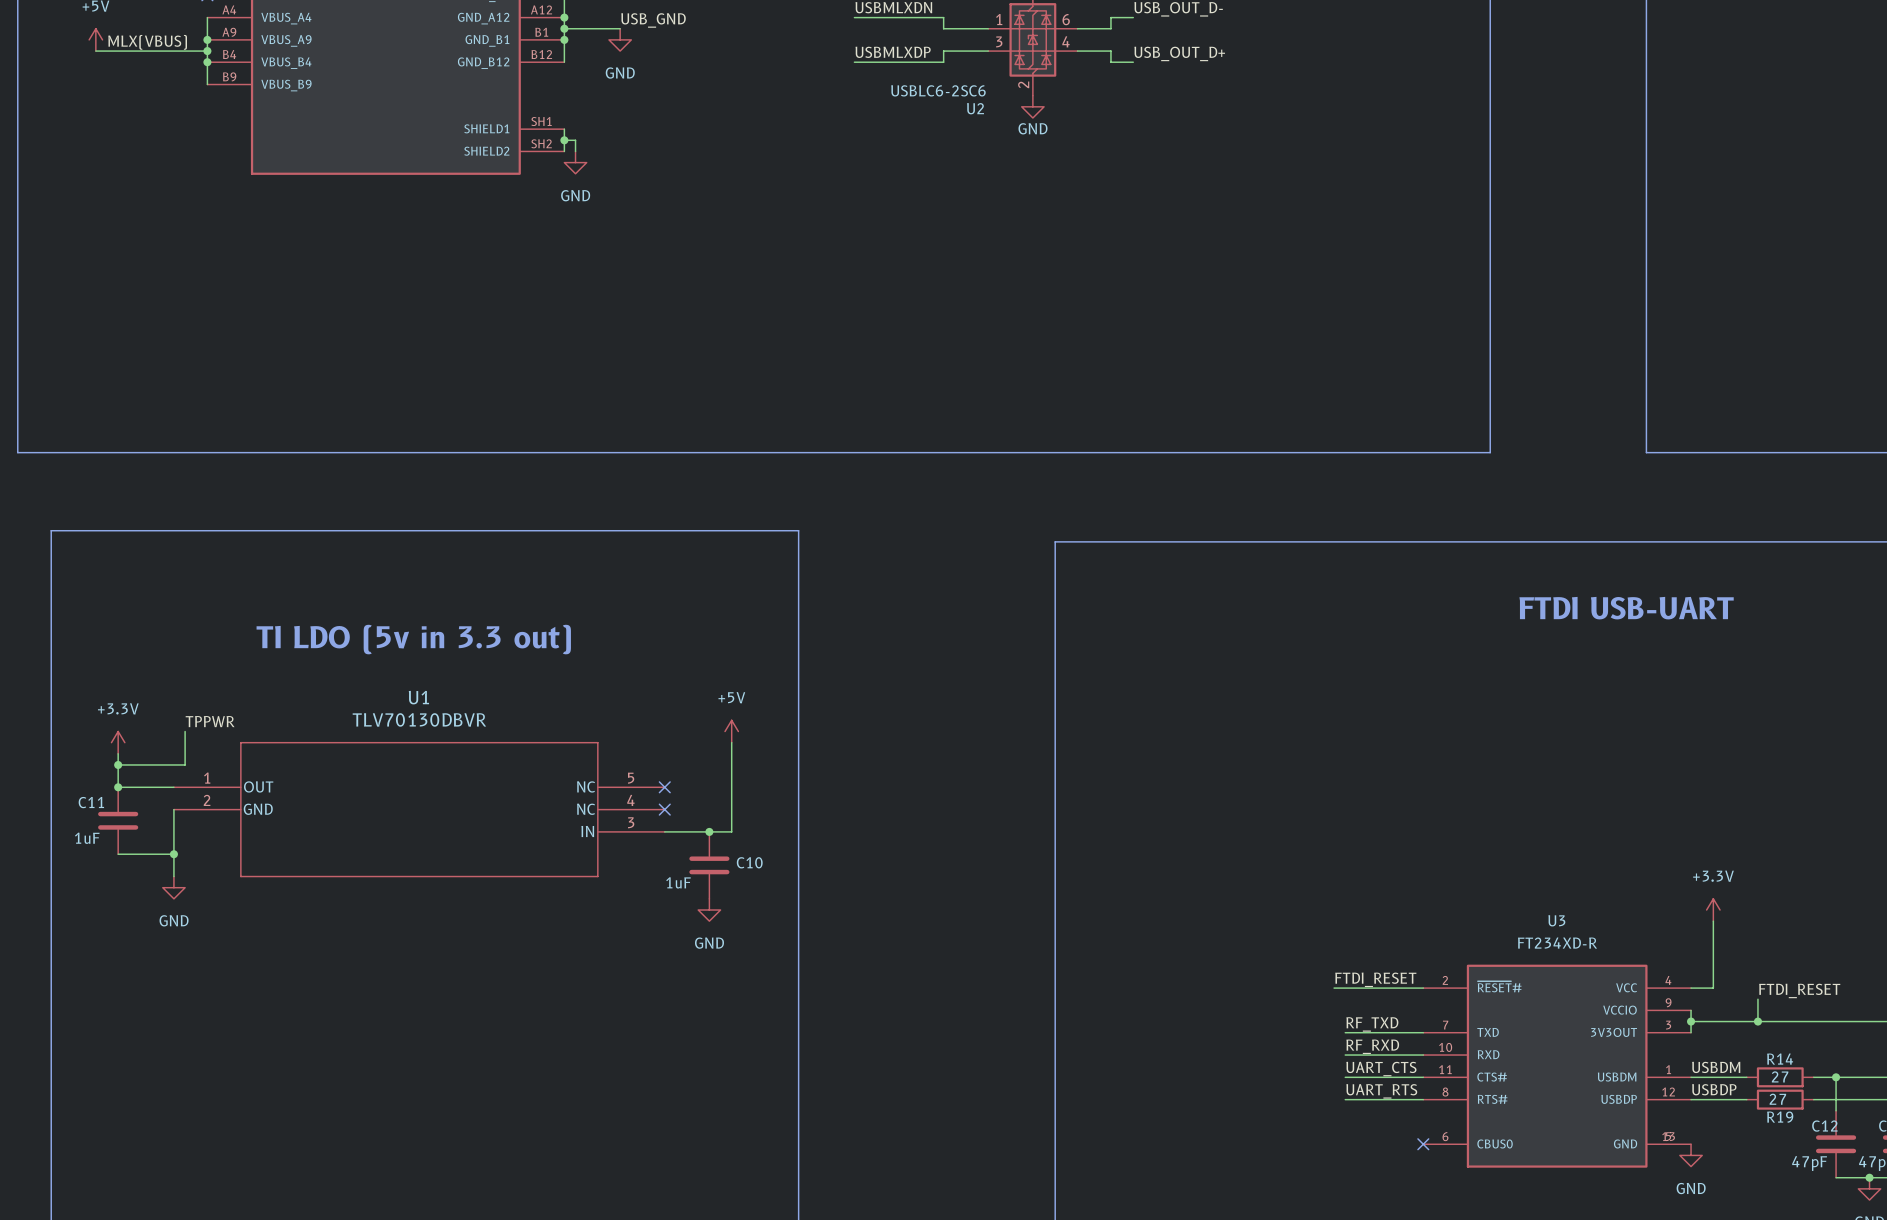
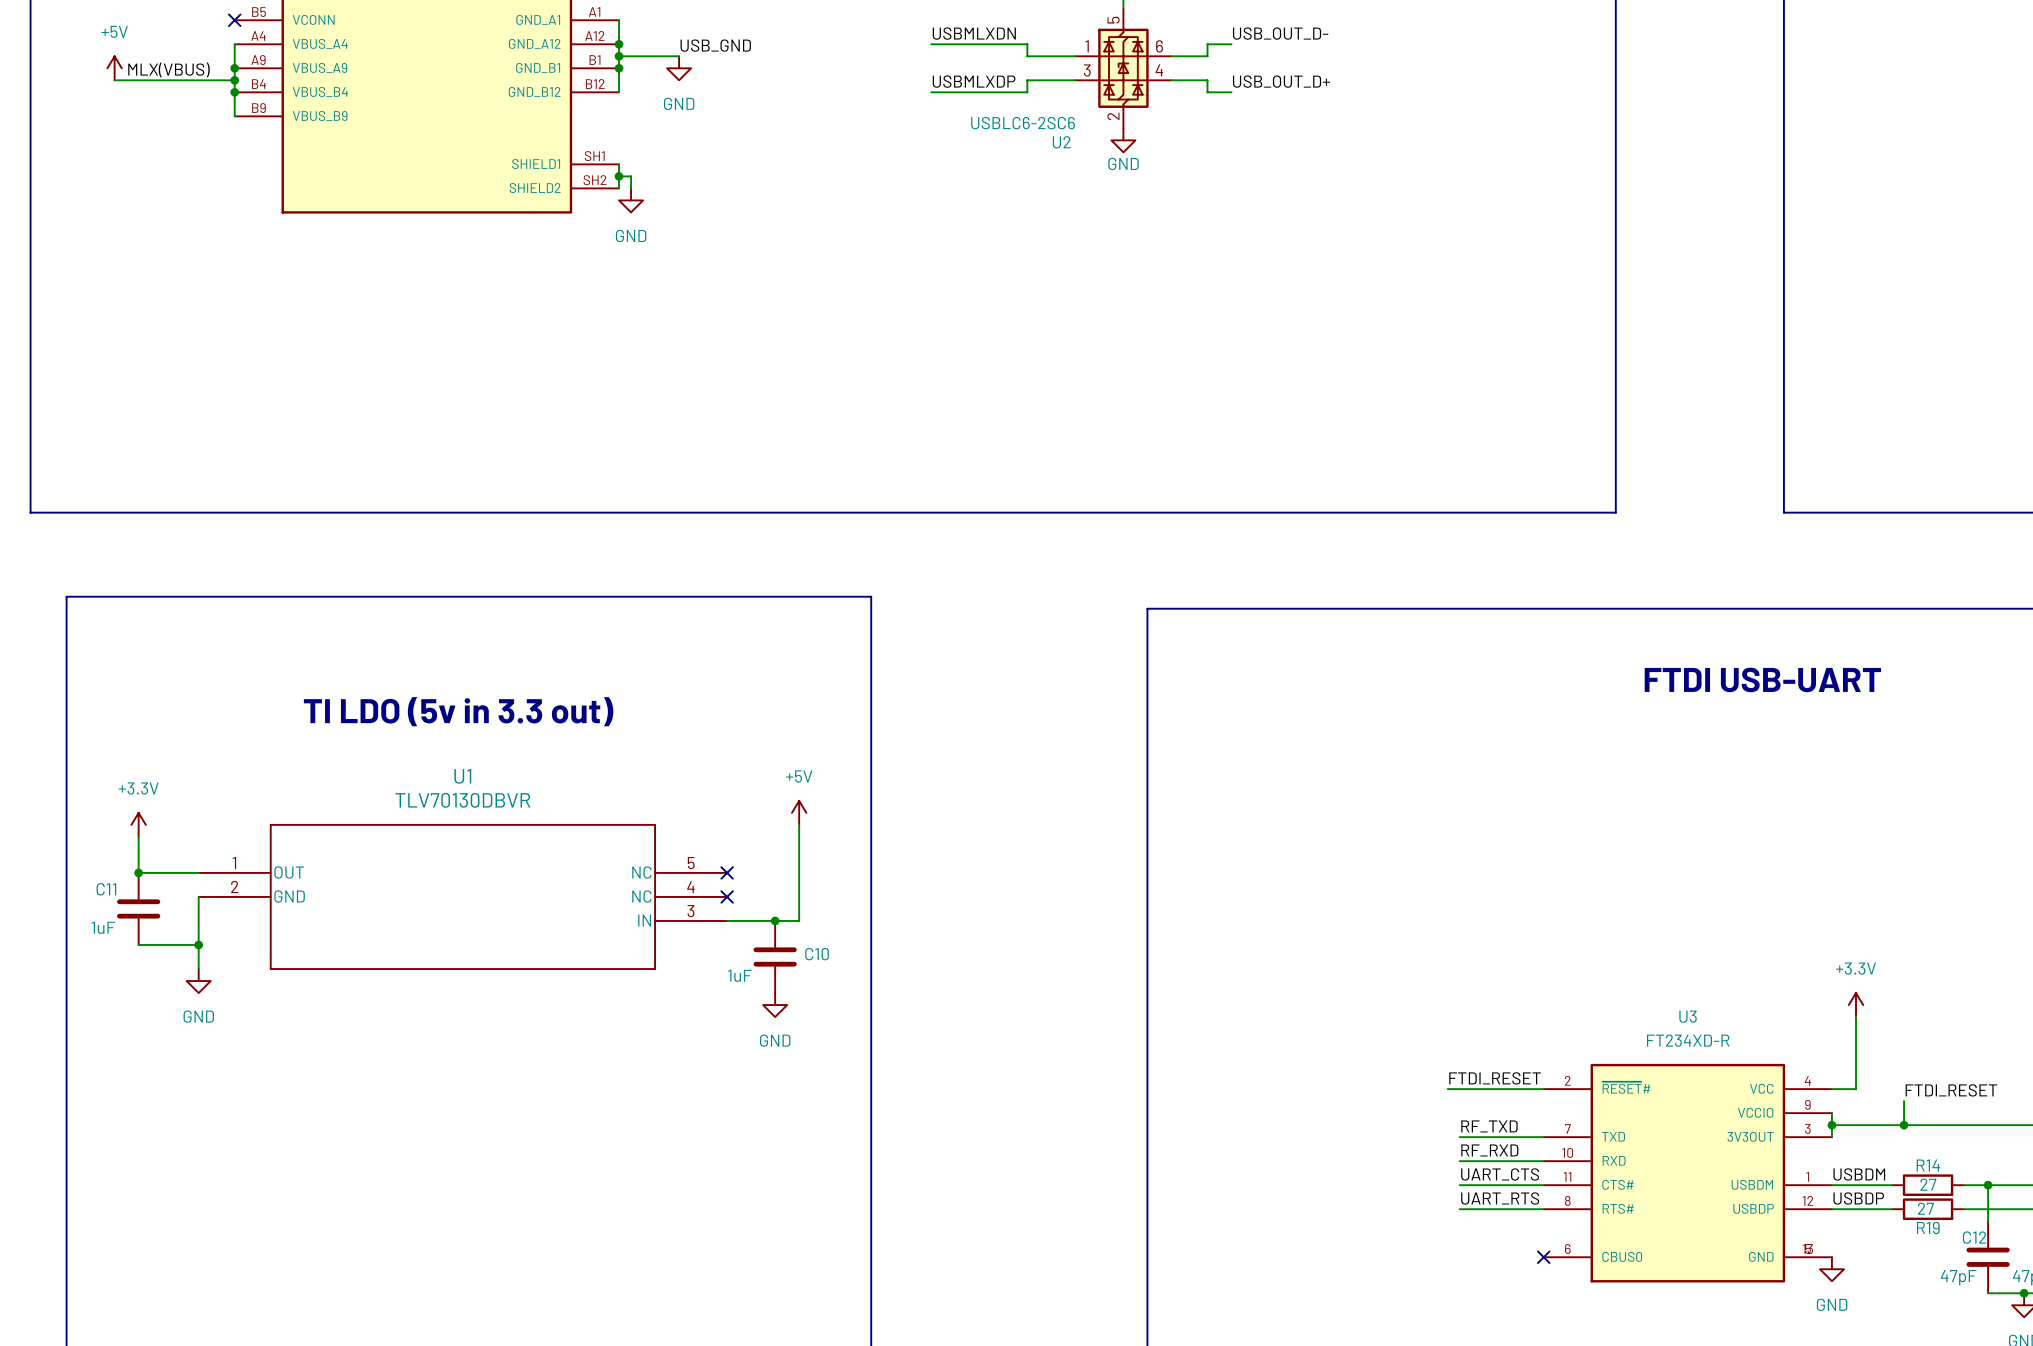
label: TPPWR (210, 721) -> none
wire: (185, 731) (185, 764) (118, 764) -> none
junction: (118, 764) -> none

